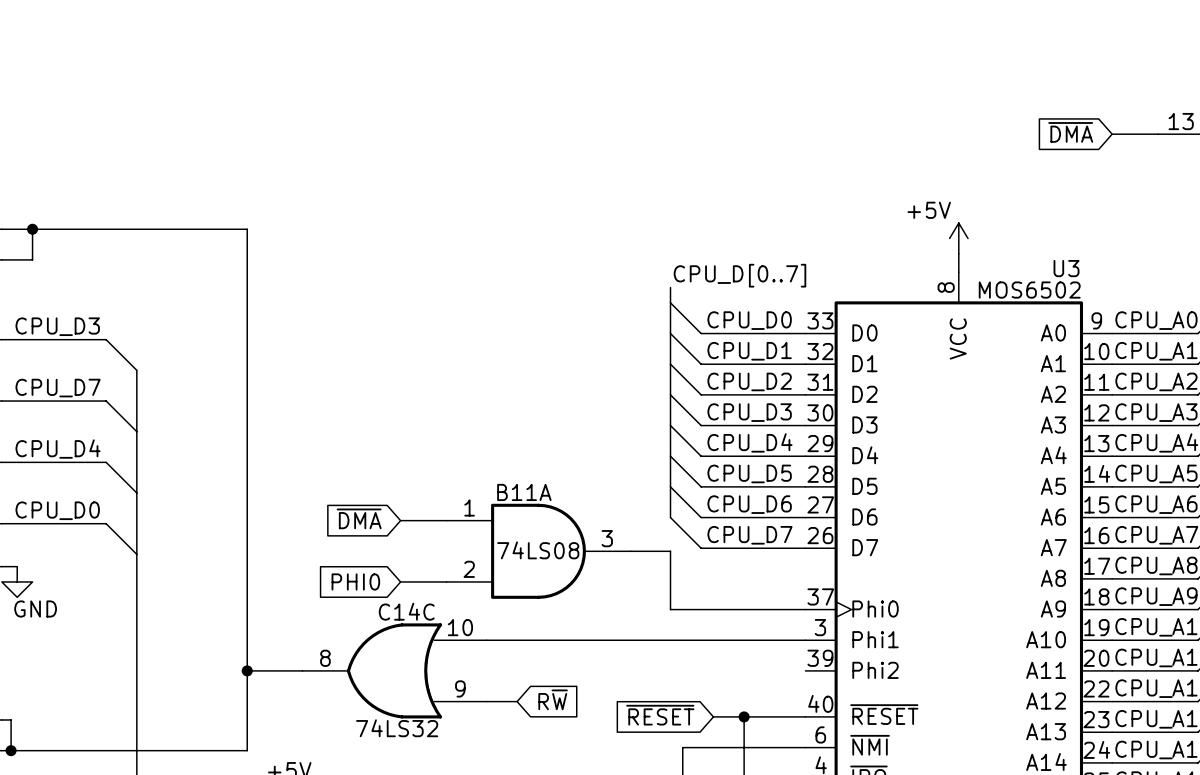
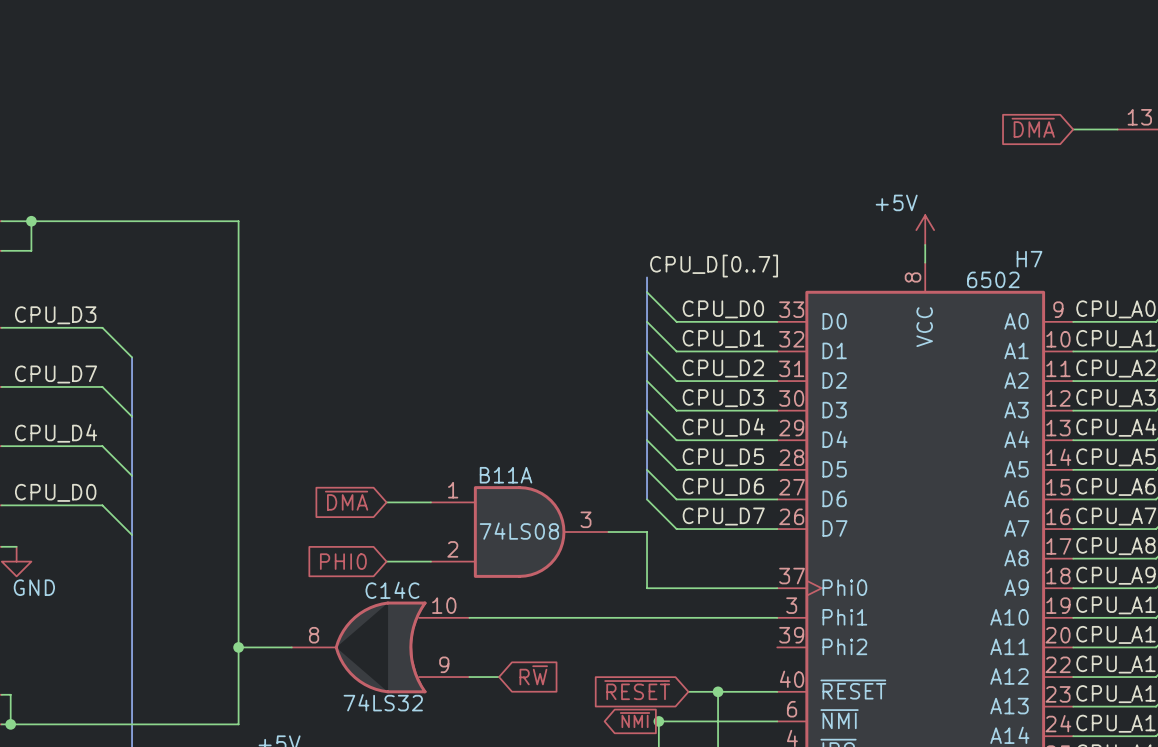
U3 name: U3 (1066, 268) -> H7 (1029, 259)
U3 value: MOS6502 (1029, 290) -> 6502 (993, 279)
global label: none -> ~{NMI} (635, 720)
junction: none -> (658, 721)

